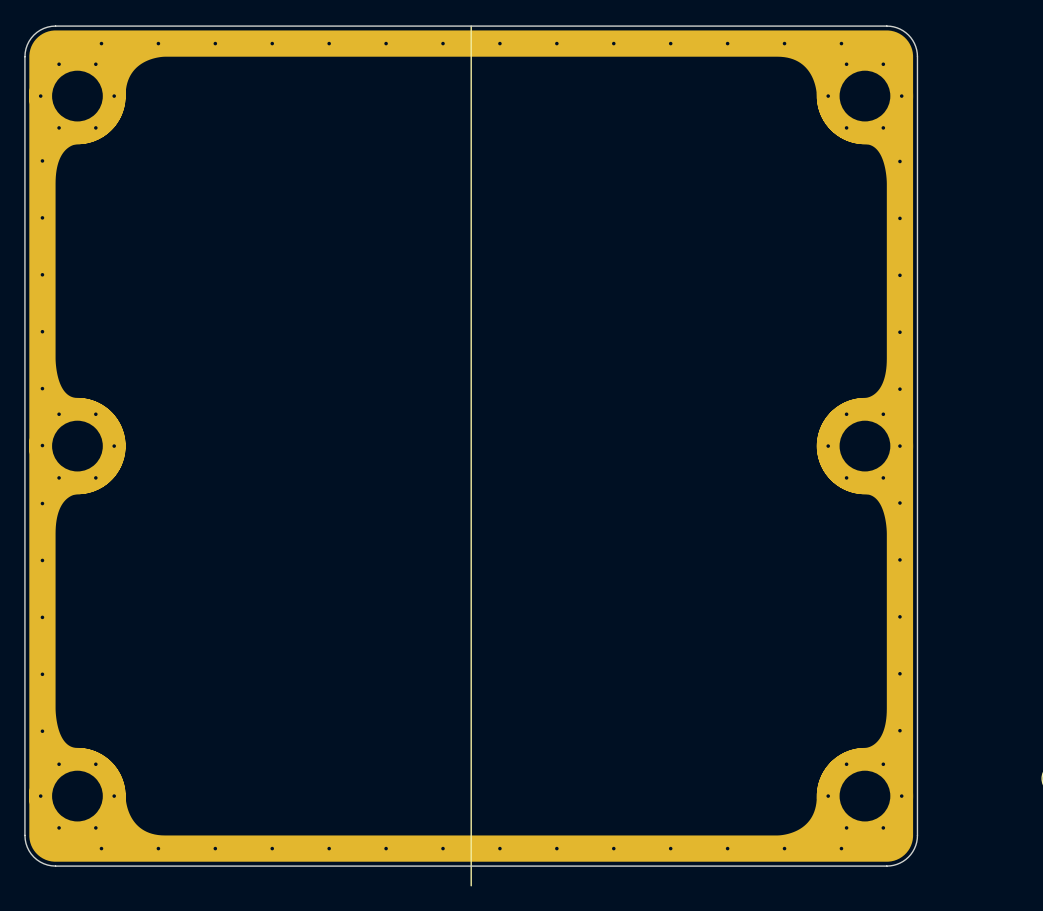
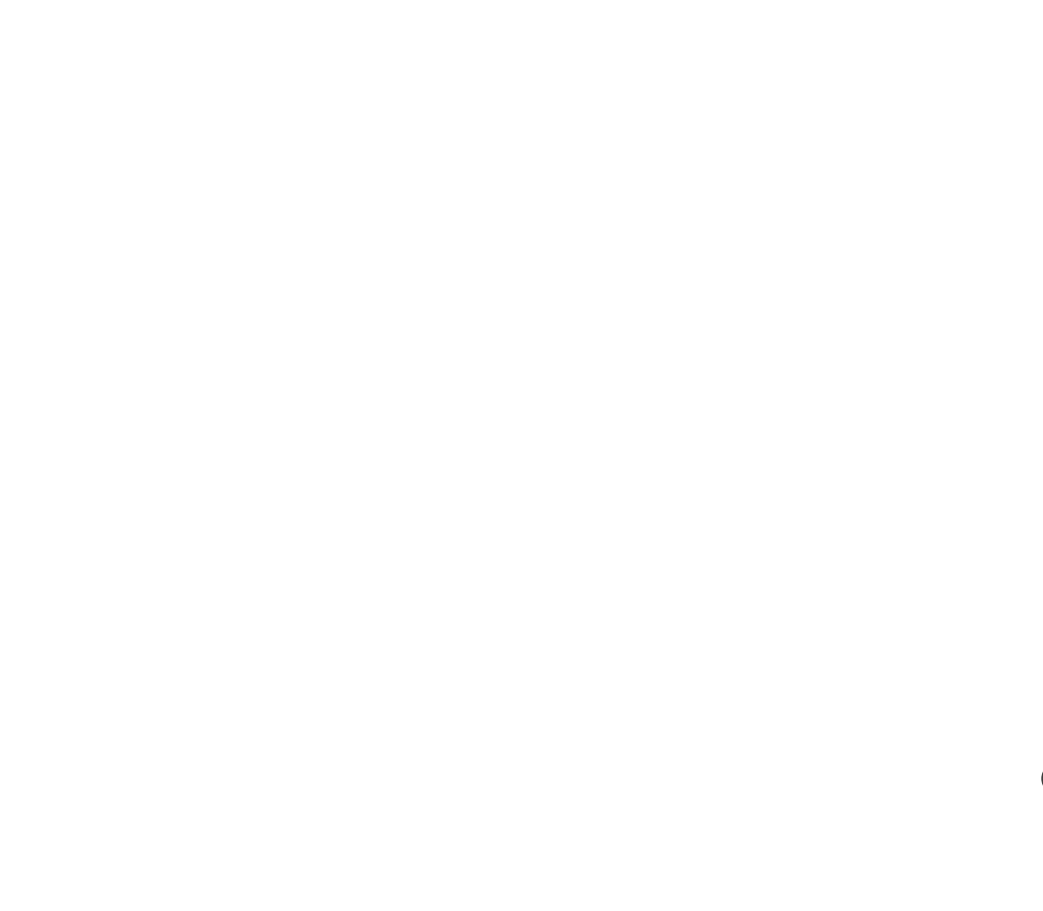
part: (471, 455) -> none

